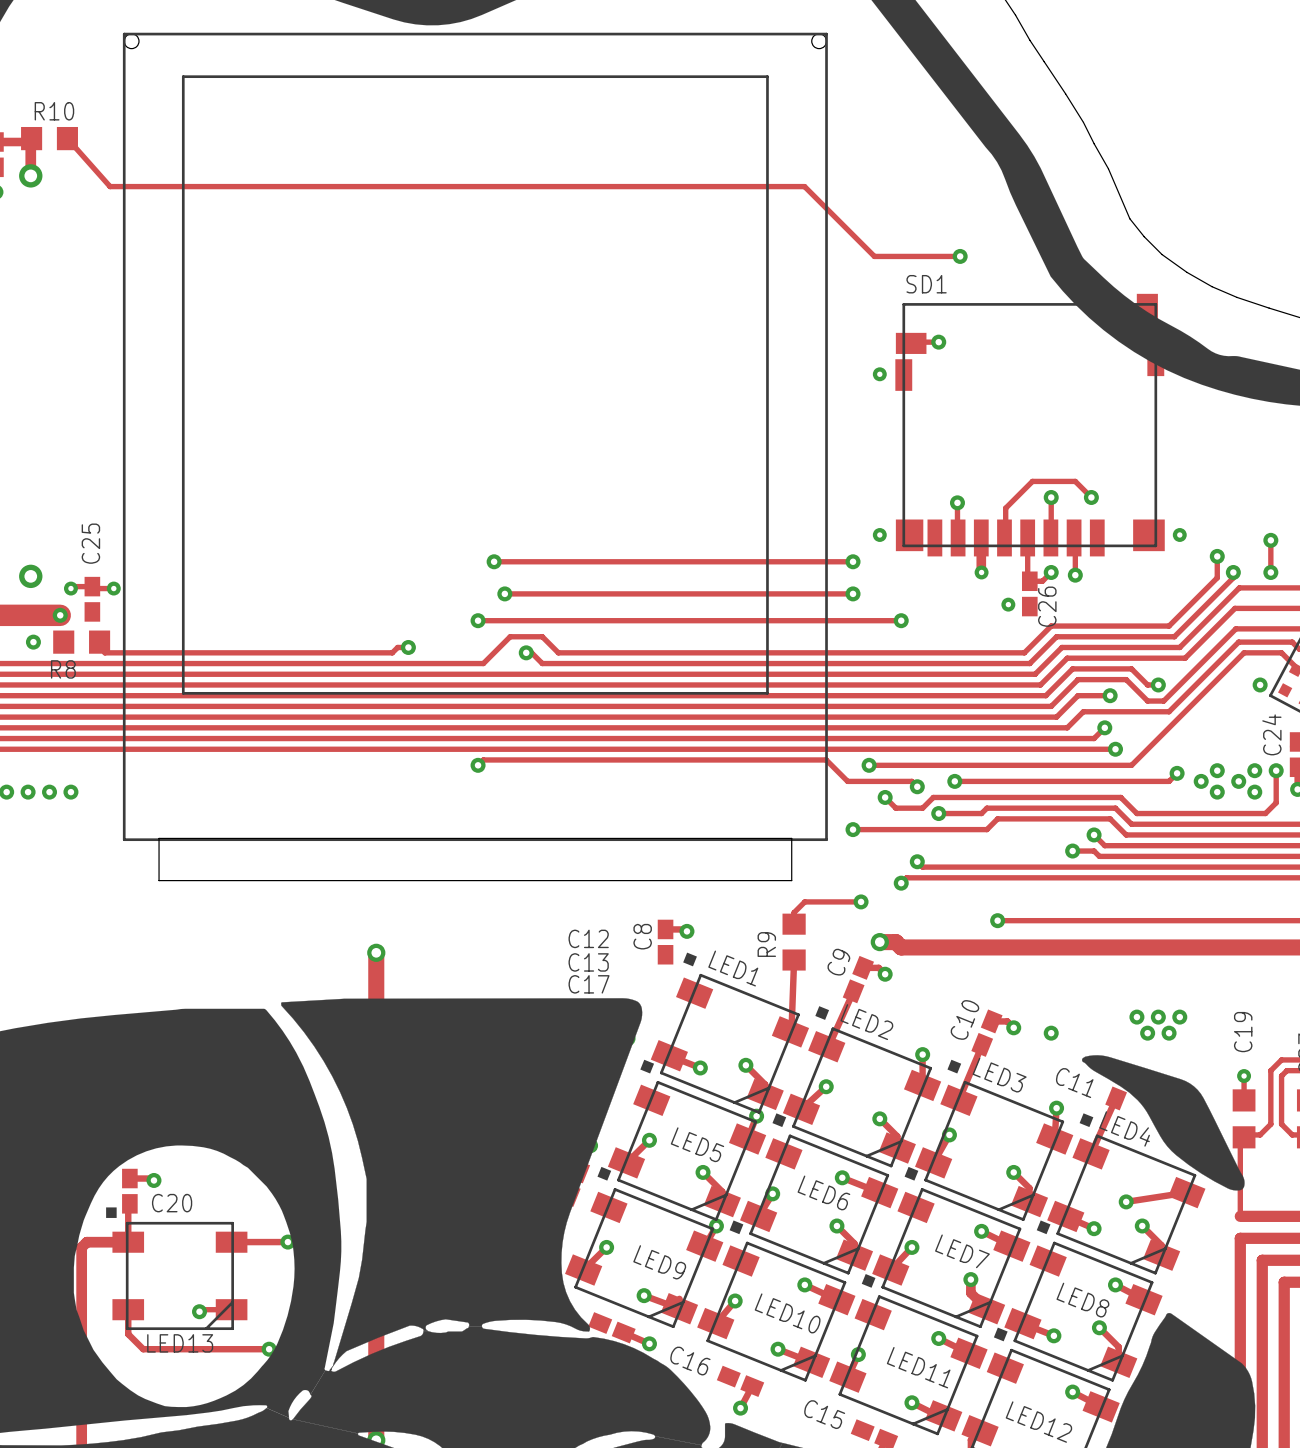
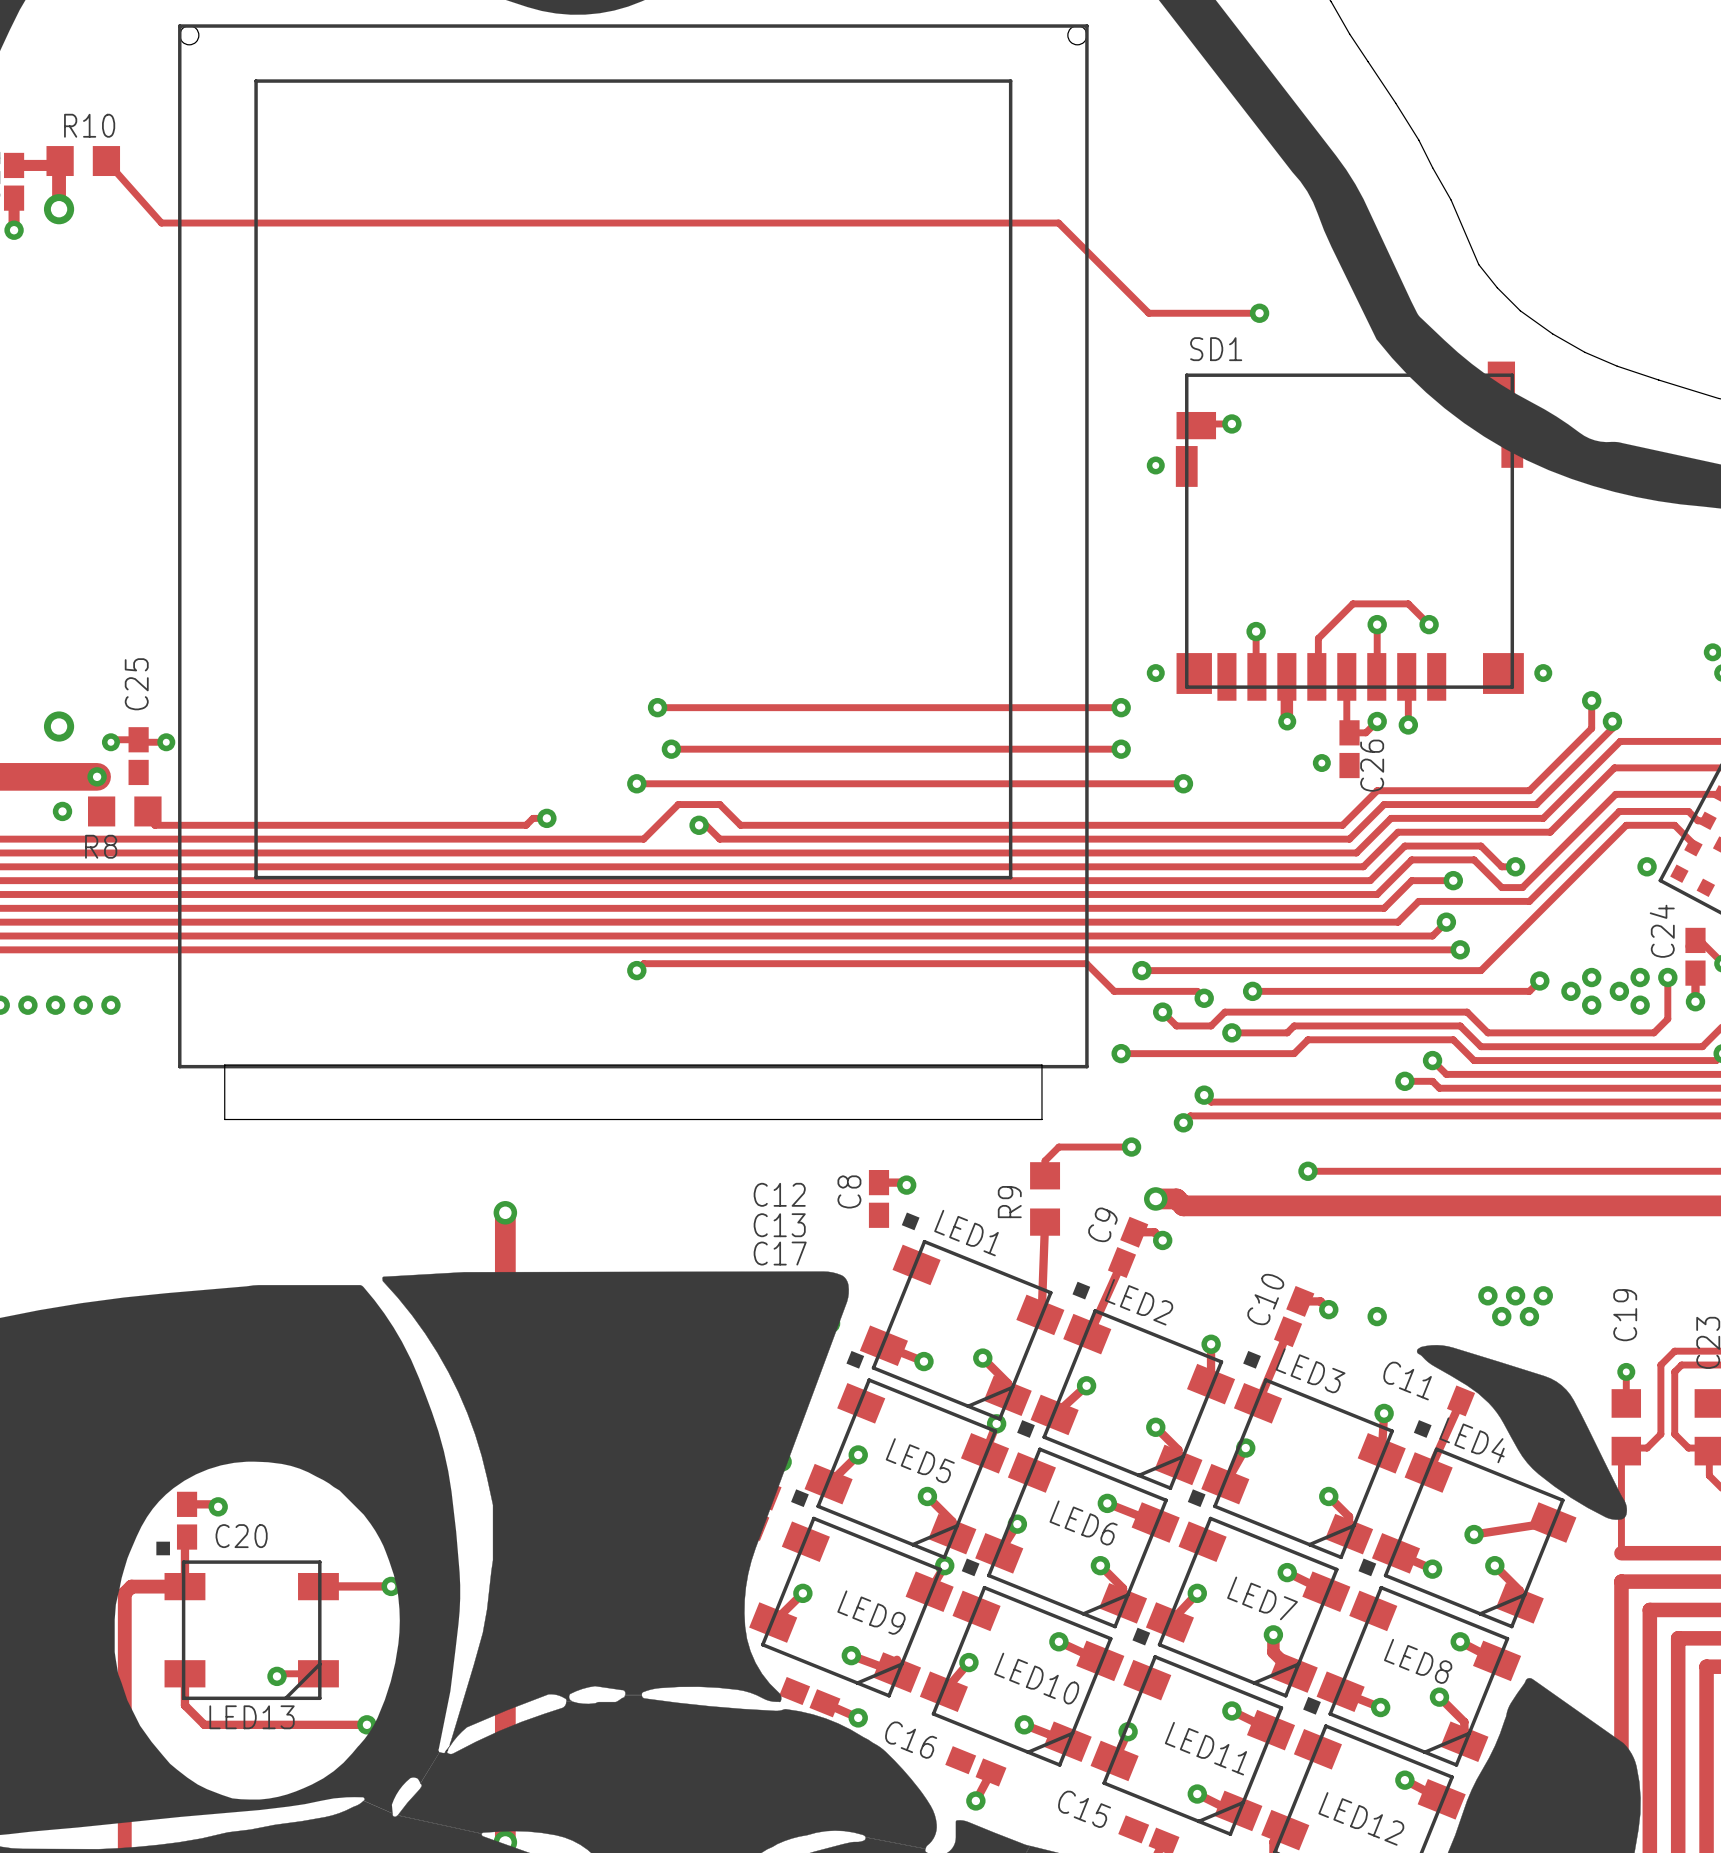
track: (1270, 540) (1270, 572) -> none
via: (1270, 540) -> none
via: (1270, 572) -> none

